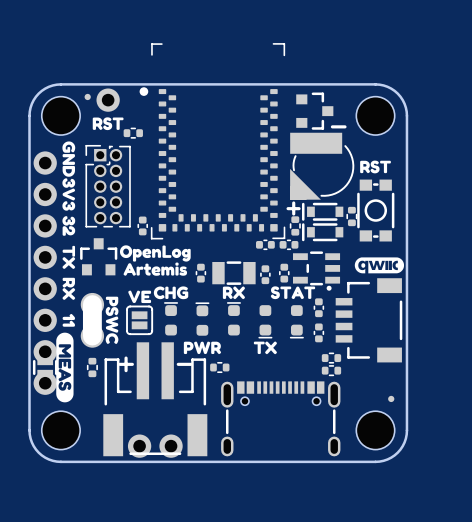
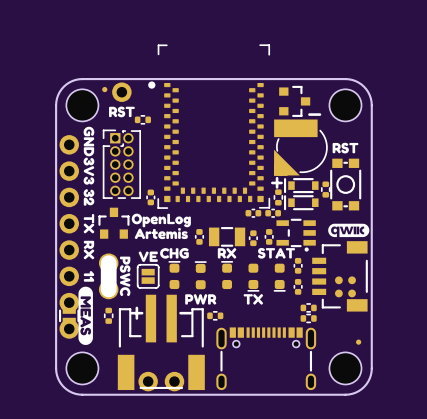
part: none -> (338, 280)
part: none -> (352, 280)
part: none -> (338, 293)
part: none -> (352, 293)

